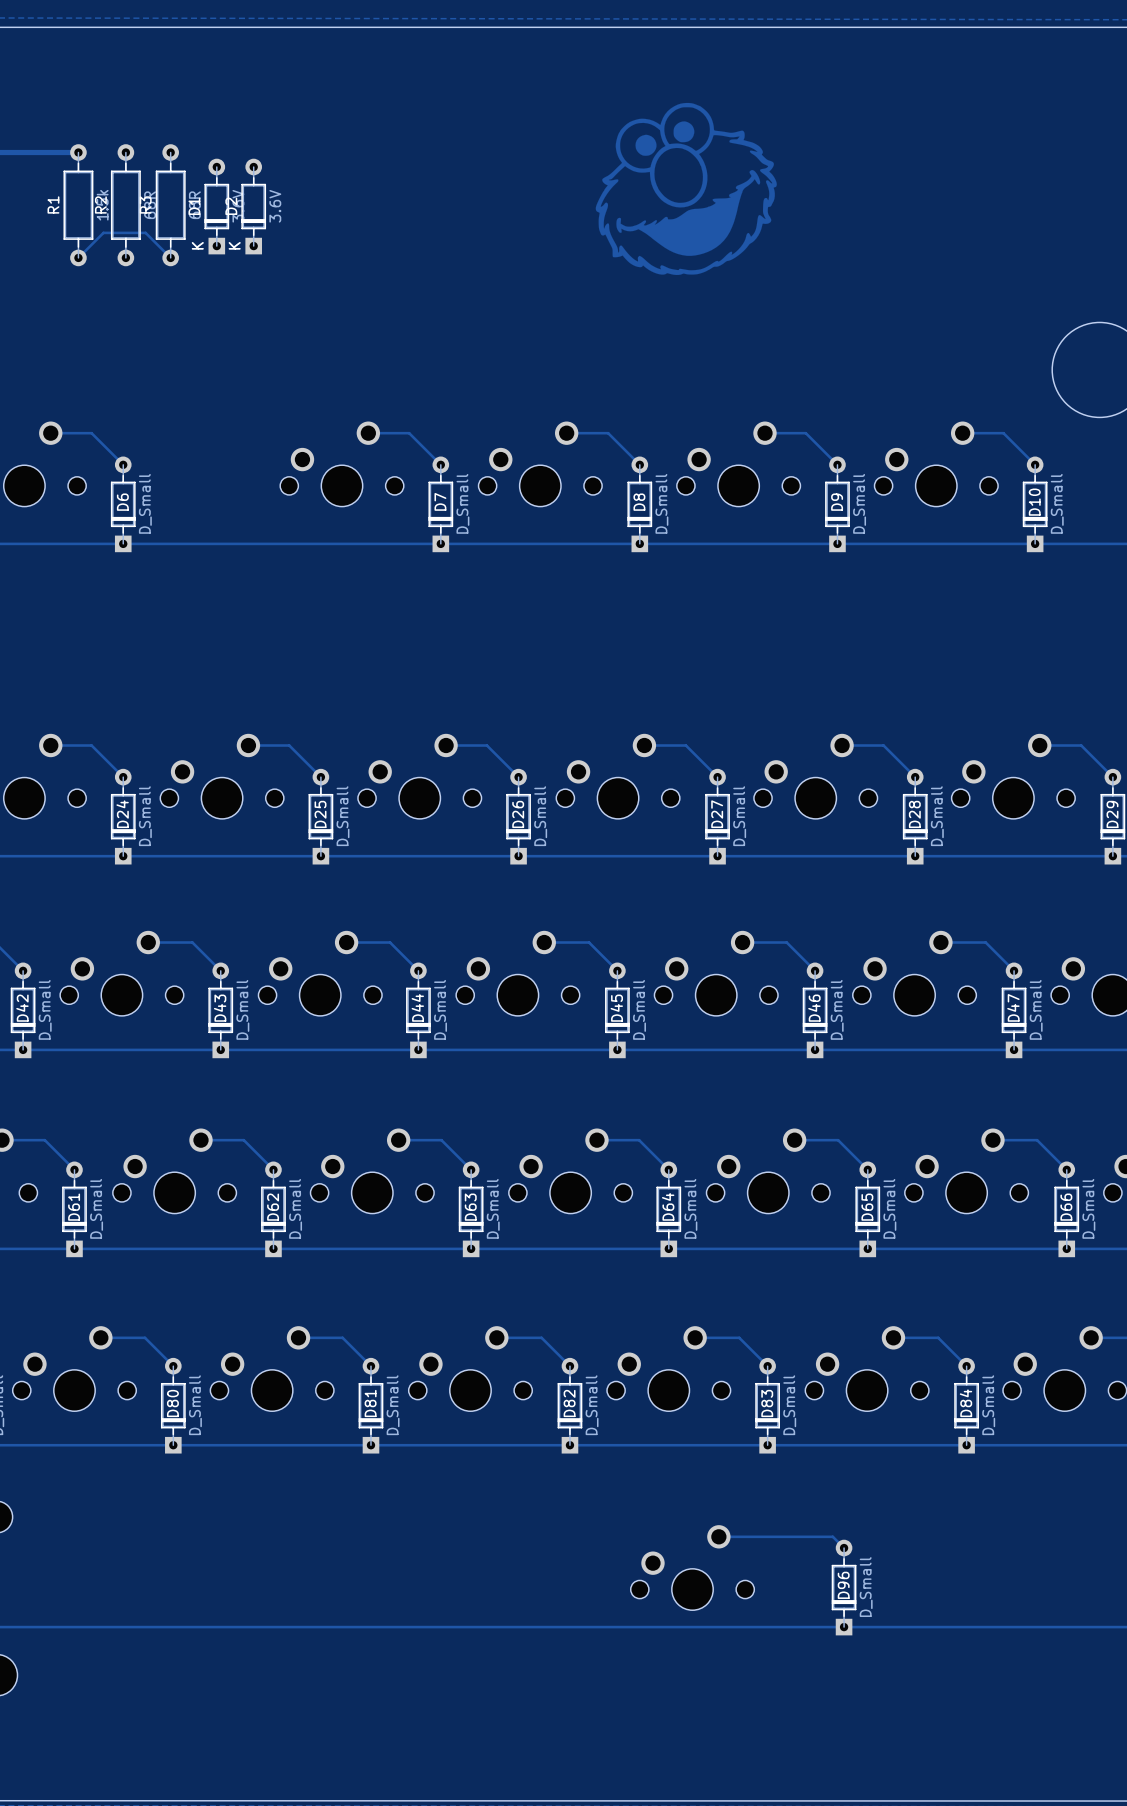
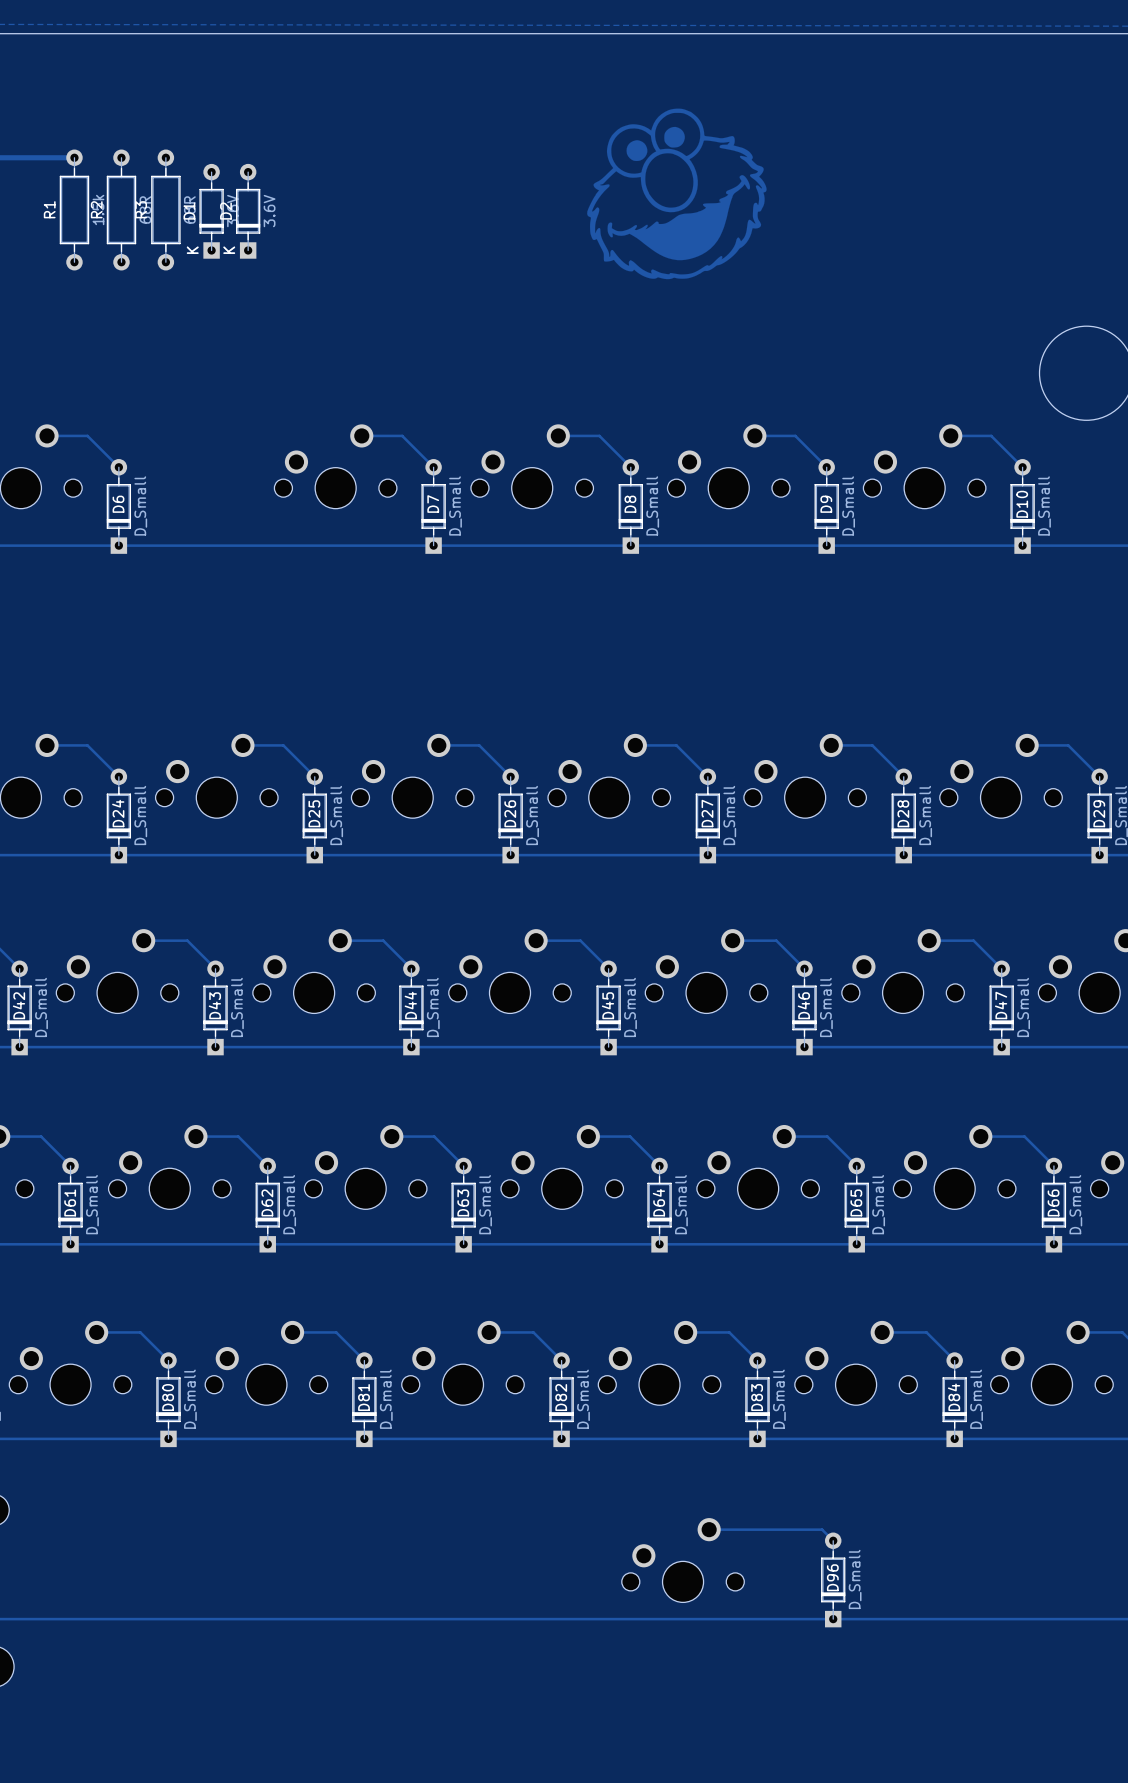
track: (78, 257) (103, 232) (145, 232) (170, 257) -> none

